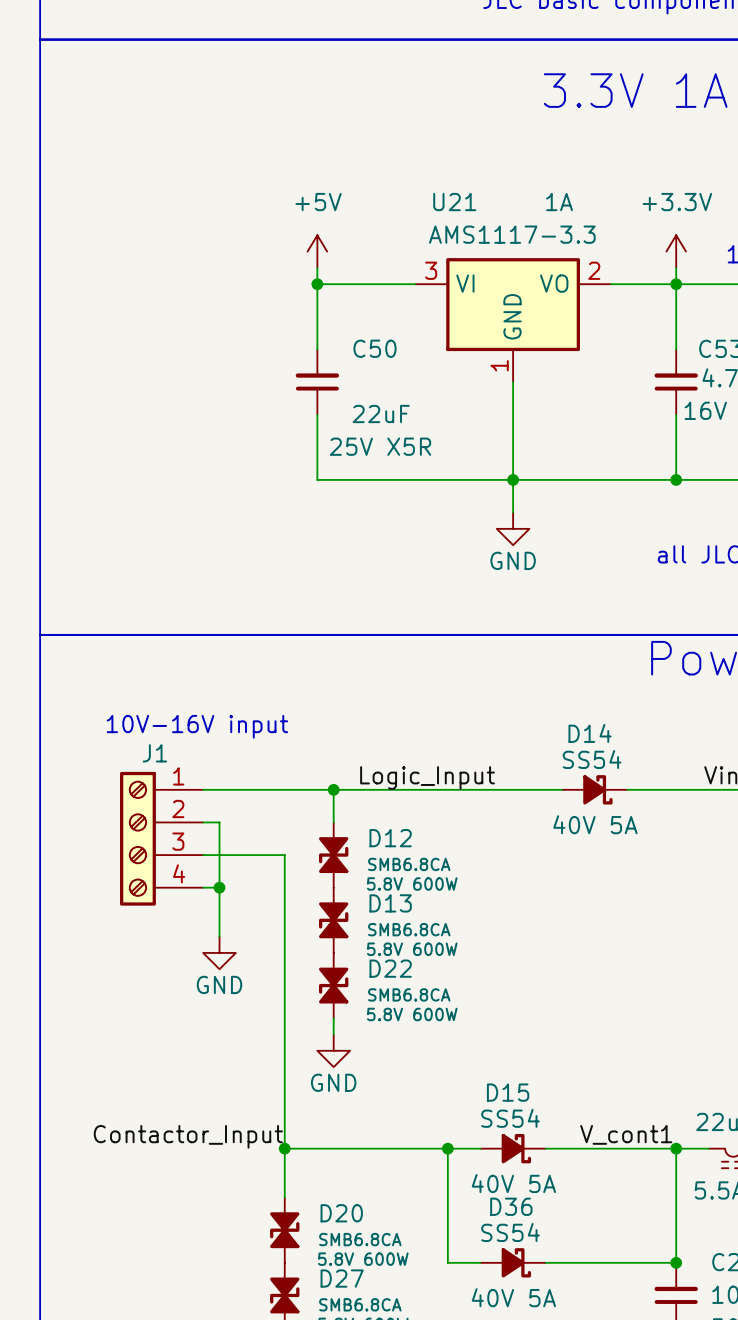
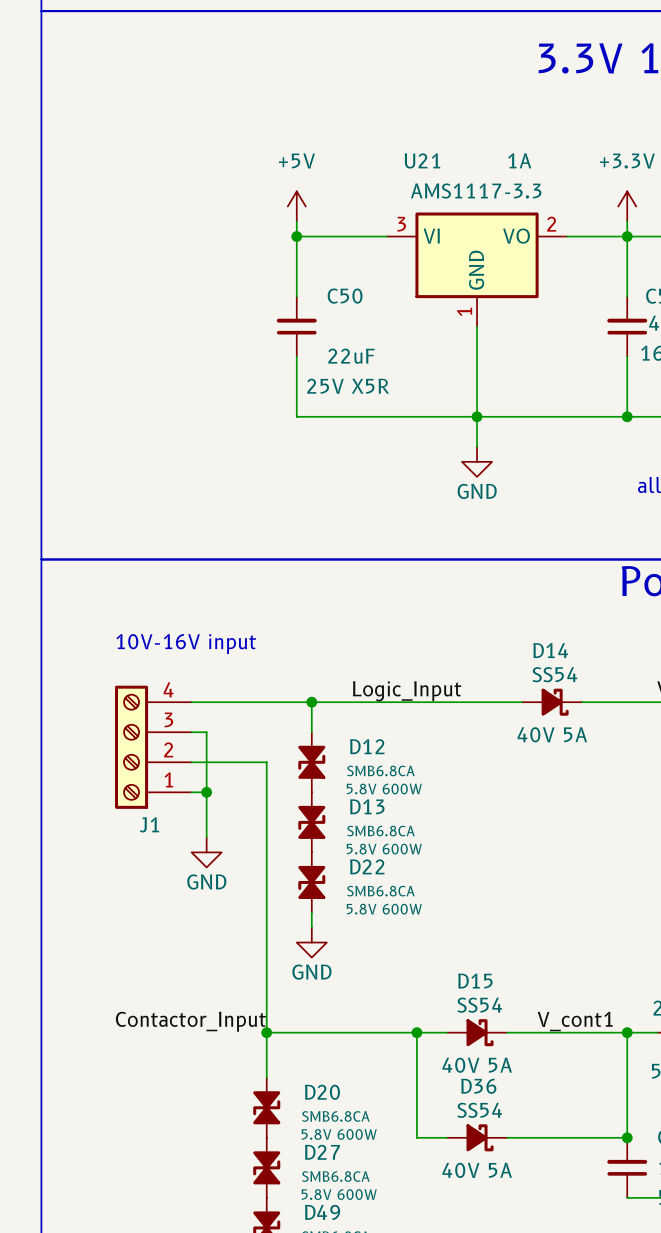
J1 flip: as is (137, 838) -> up-down (131, 747)

